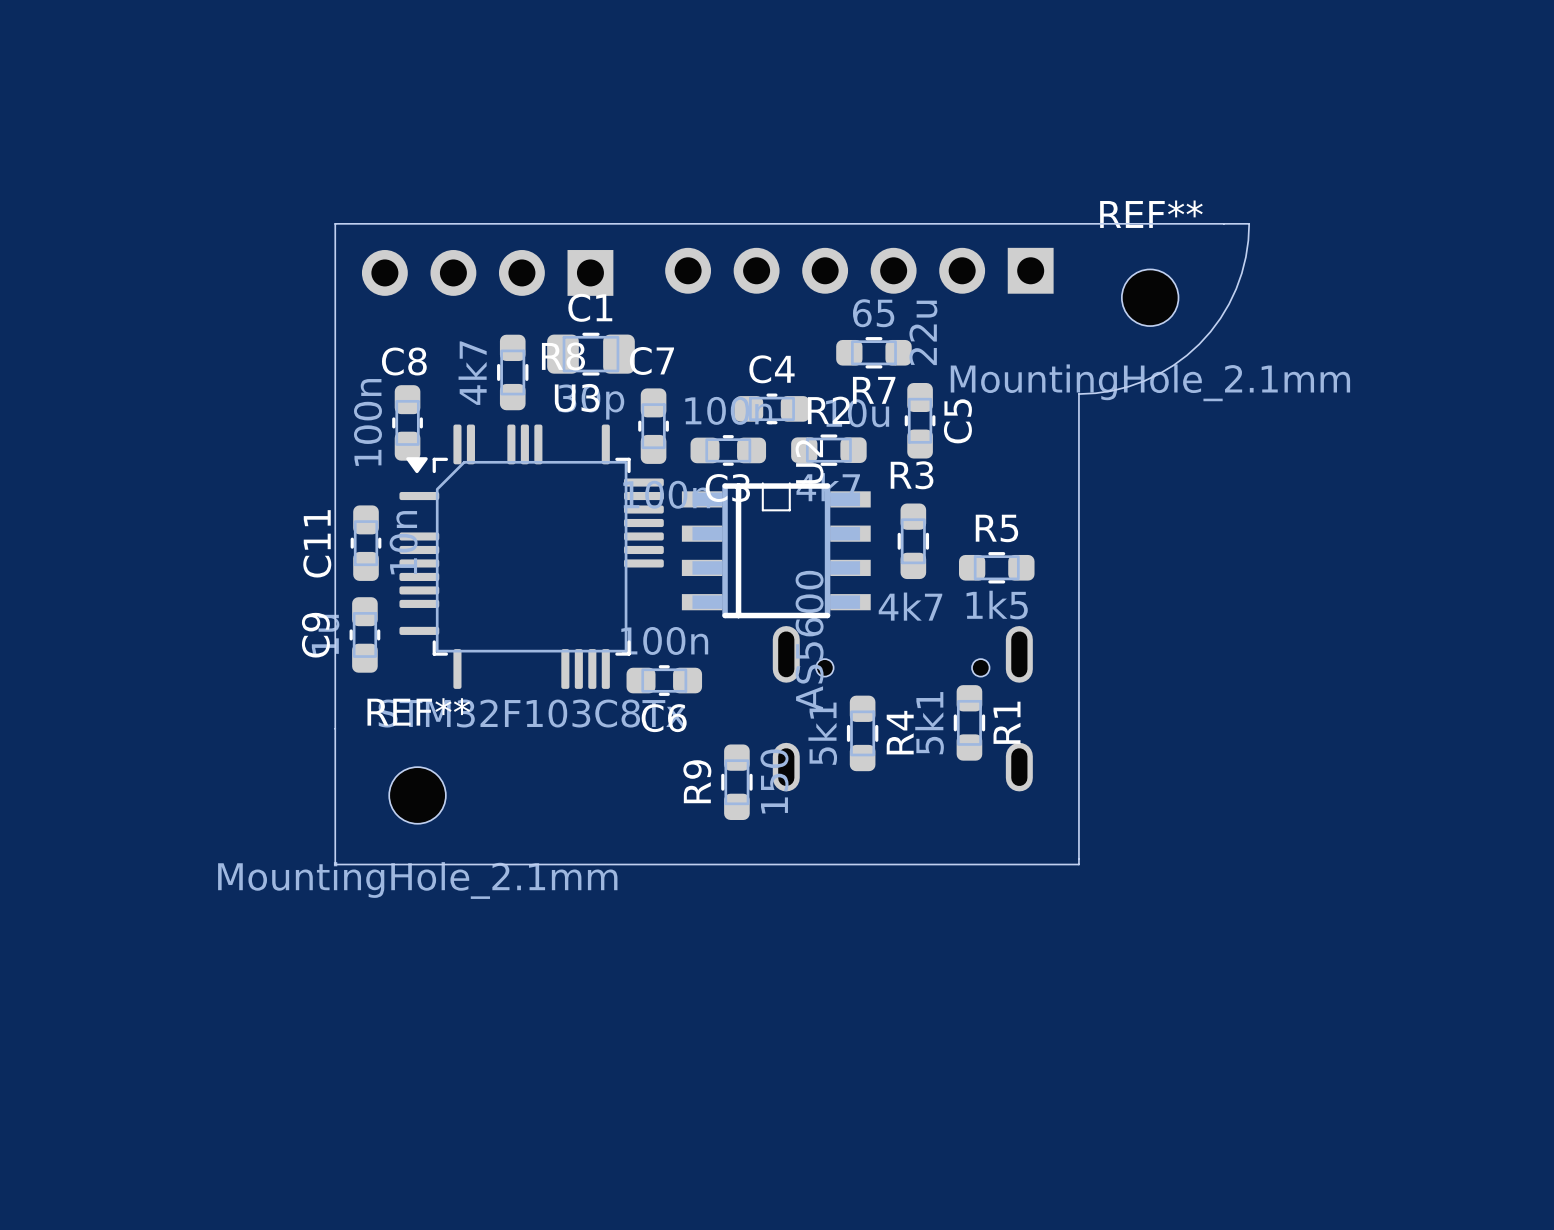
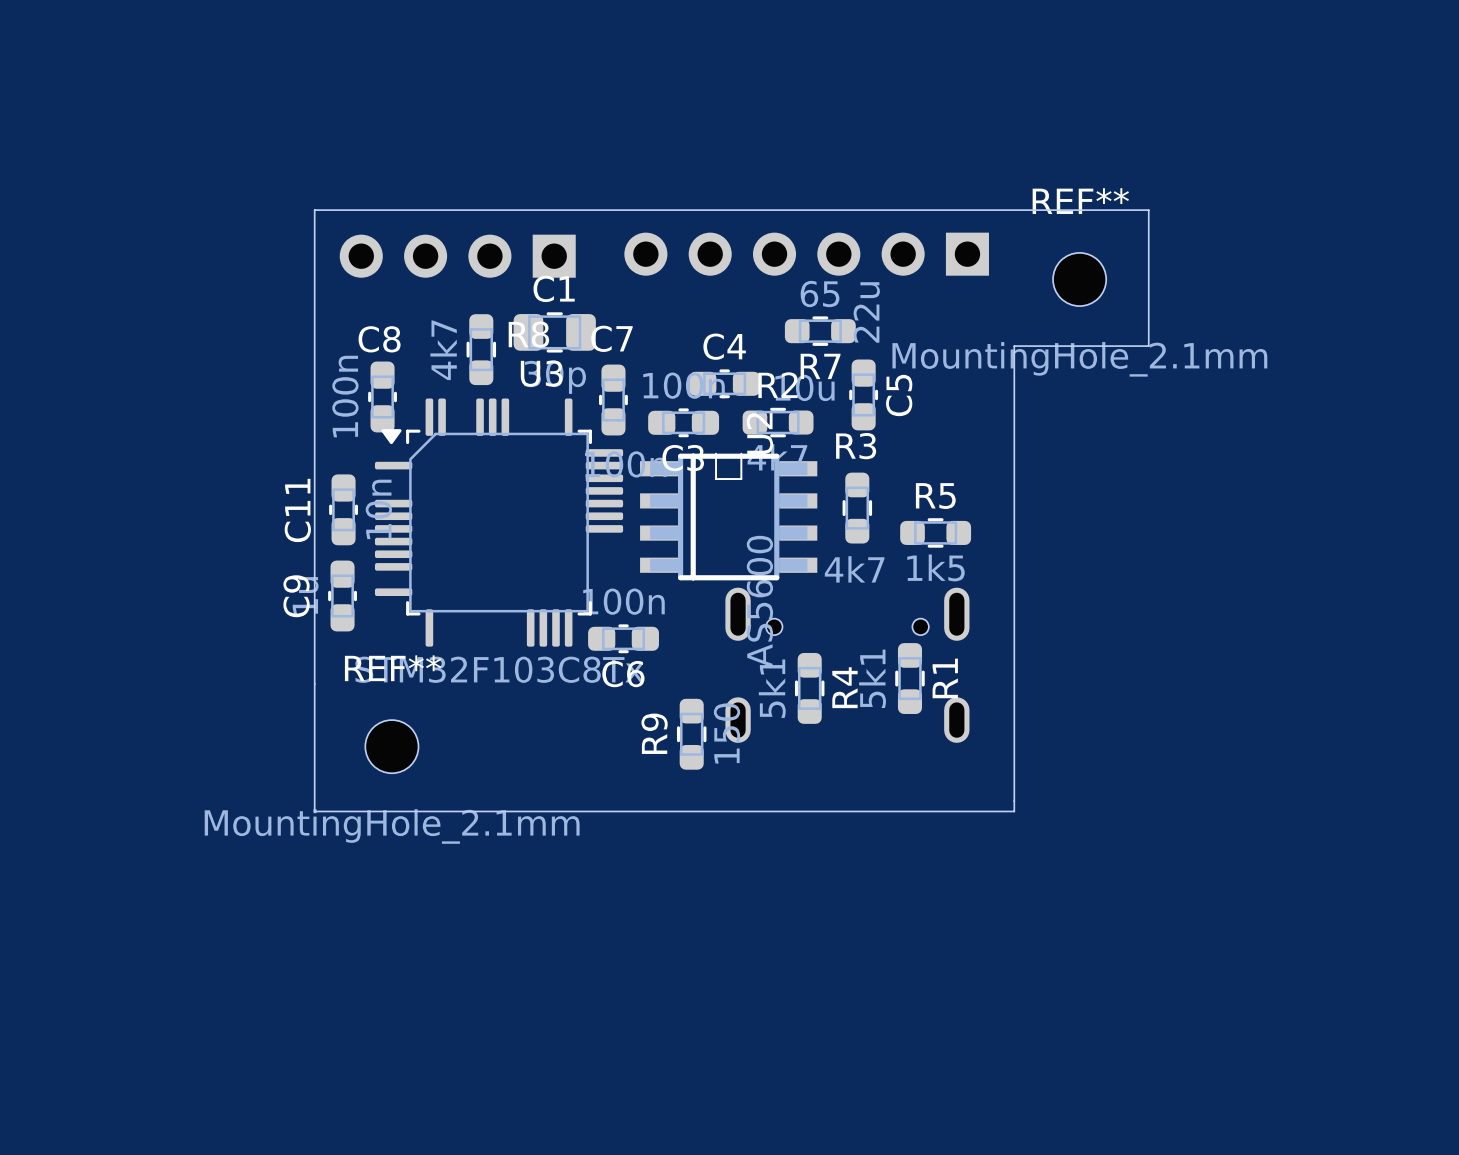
board edge: (1223, 223) (1248, 223) -> none
board edge: (1249, 223) (1245, 257) (1236, 288) (1220, 318) (1199, 344) (1173, 365) (1144, 381) (1112, 390) (1078, 394) (1078, 864) -> (1148, 210) (1148, 346) (1014, 346) (1014, 811) (1012, 811)

